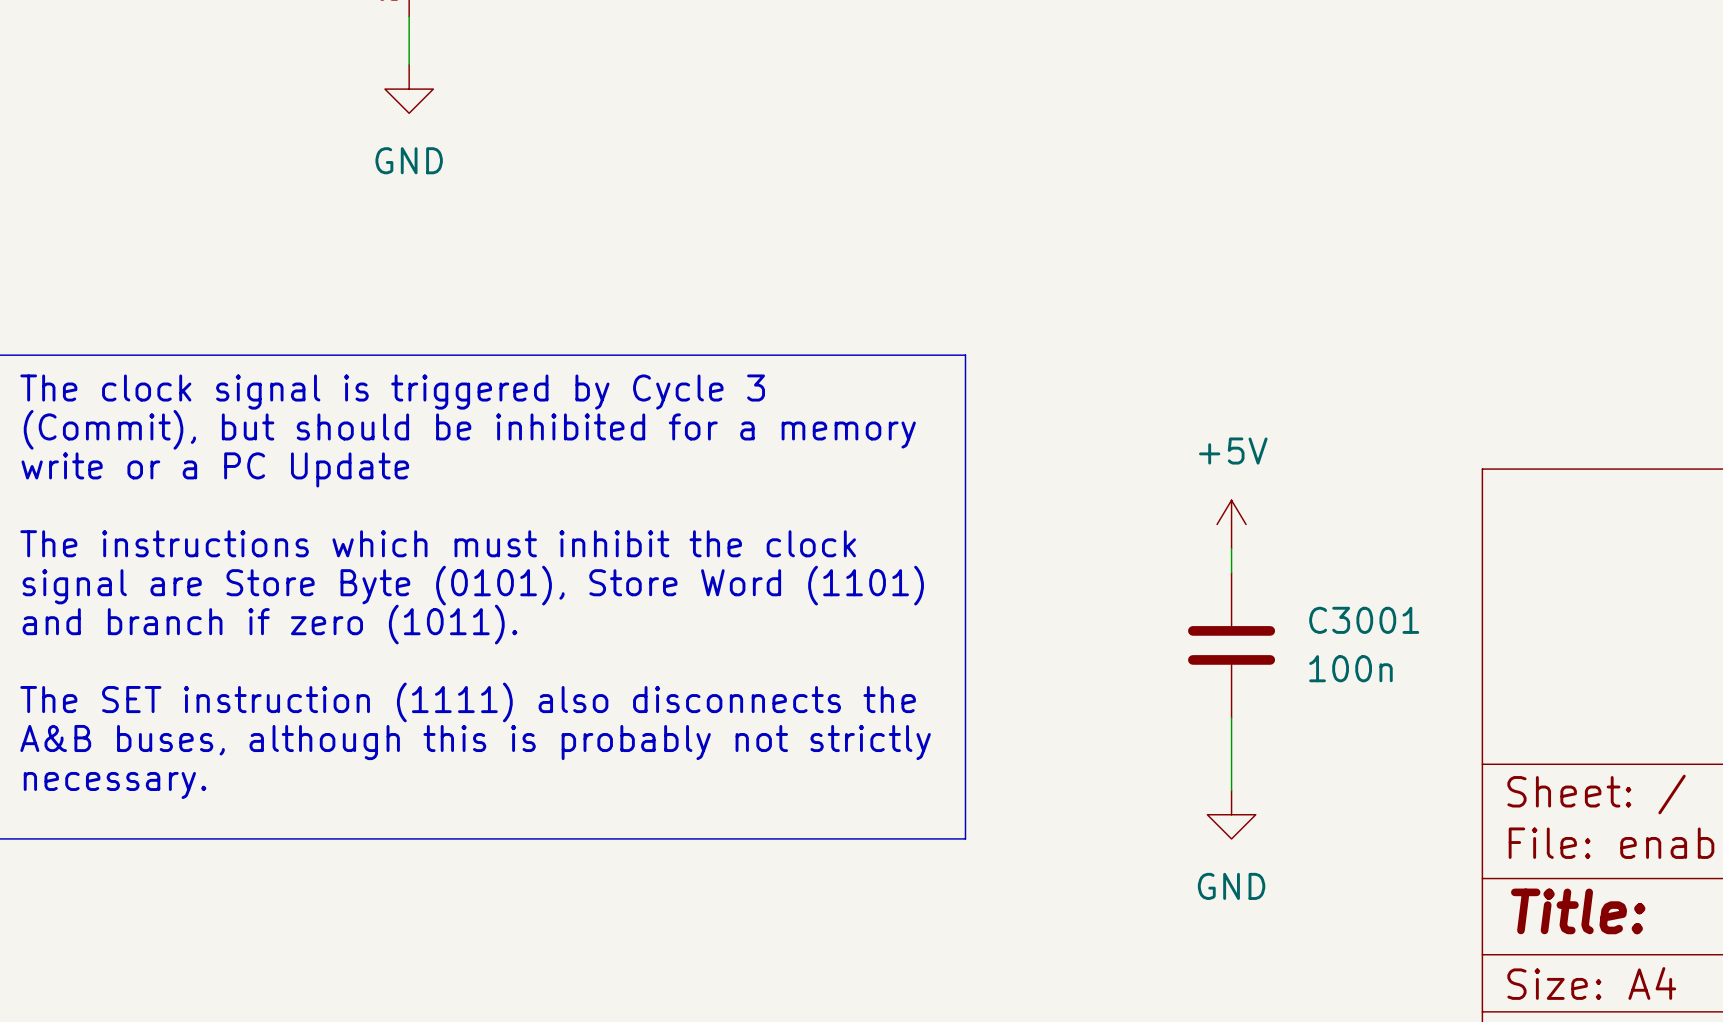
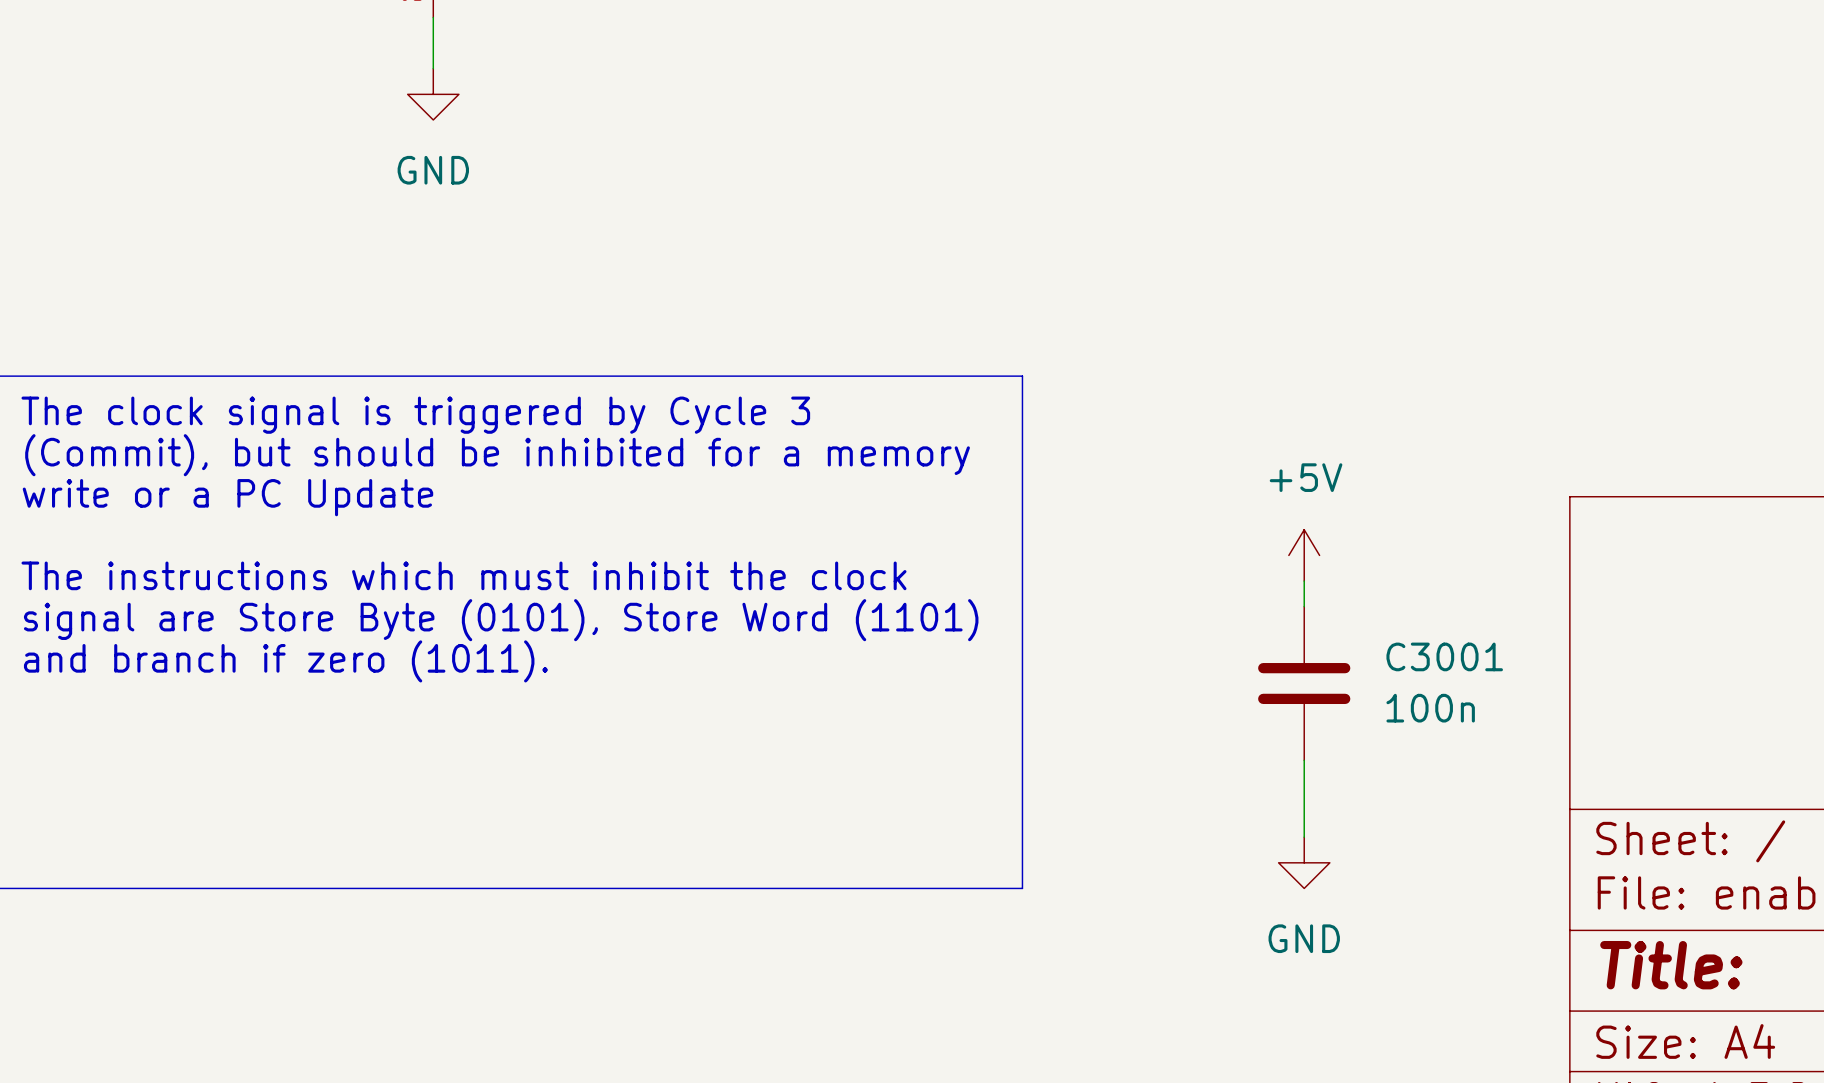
text: The SET instruction (1111) also disconnects the (468, 702) -> none
text: A&B buses, although this is probably not strictly (475, 742) -> none
text: necessary. (115, 785) -> none

